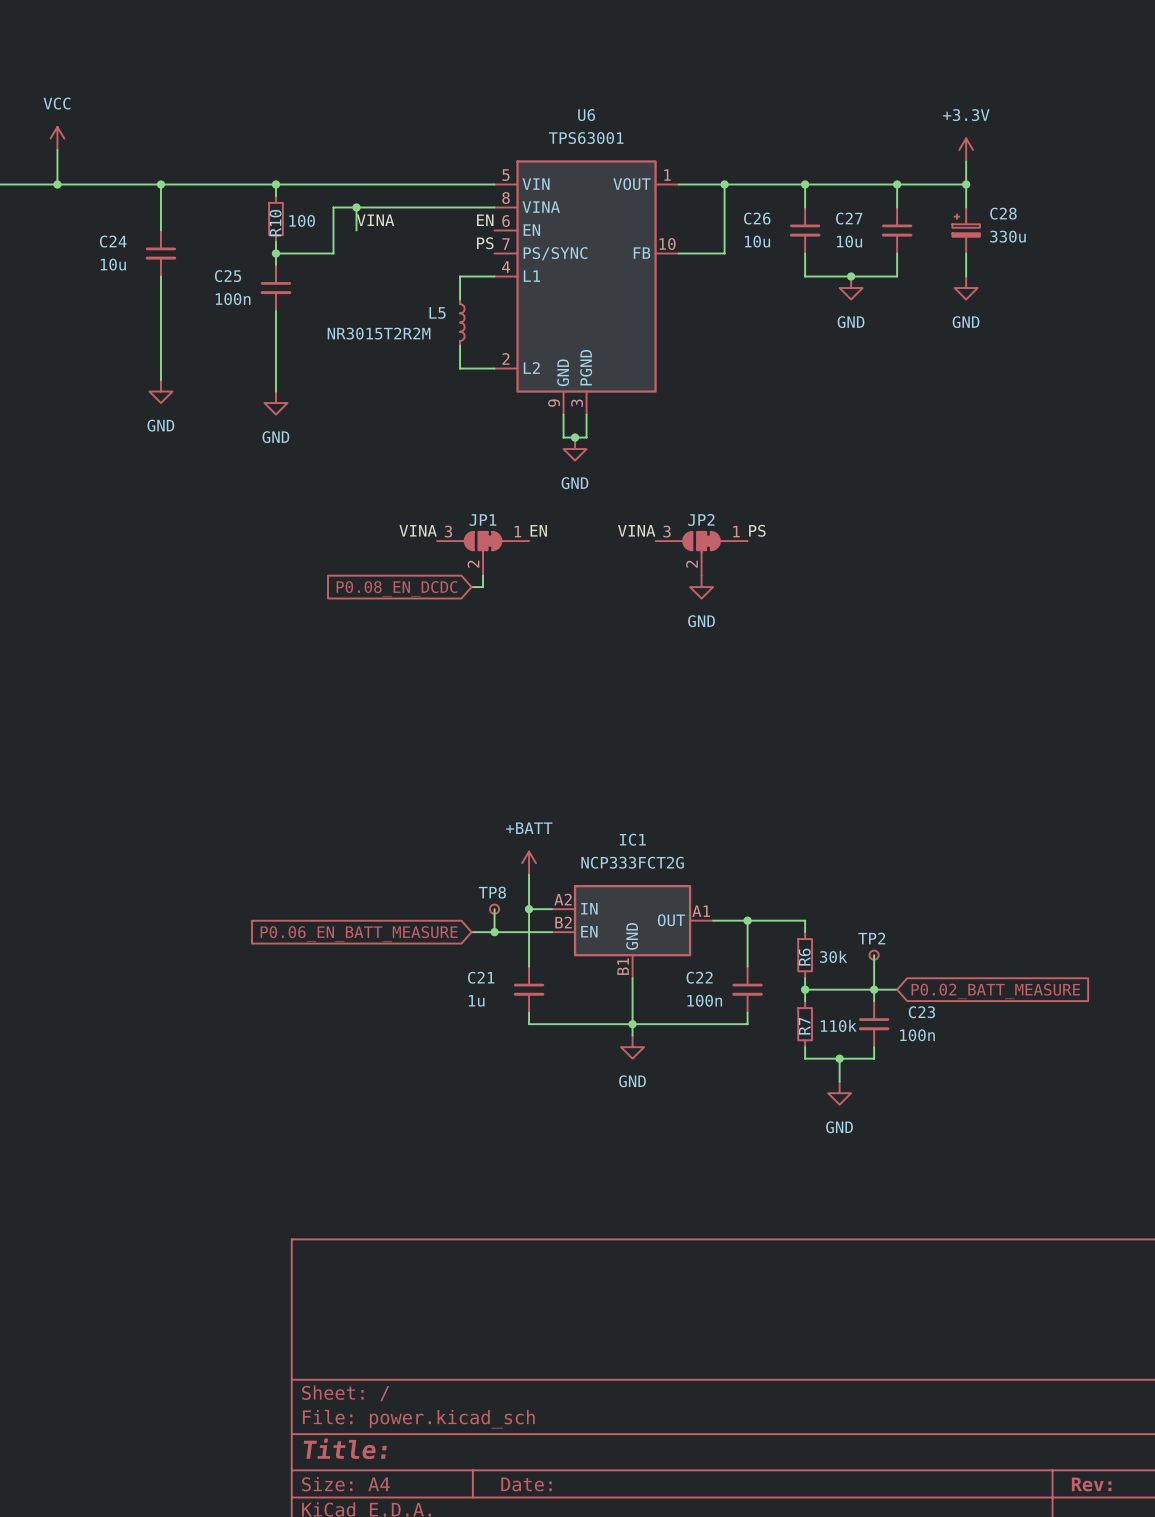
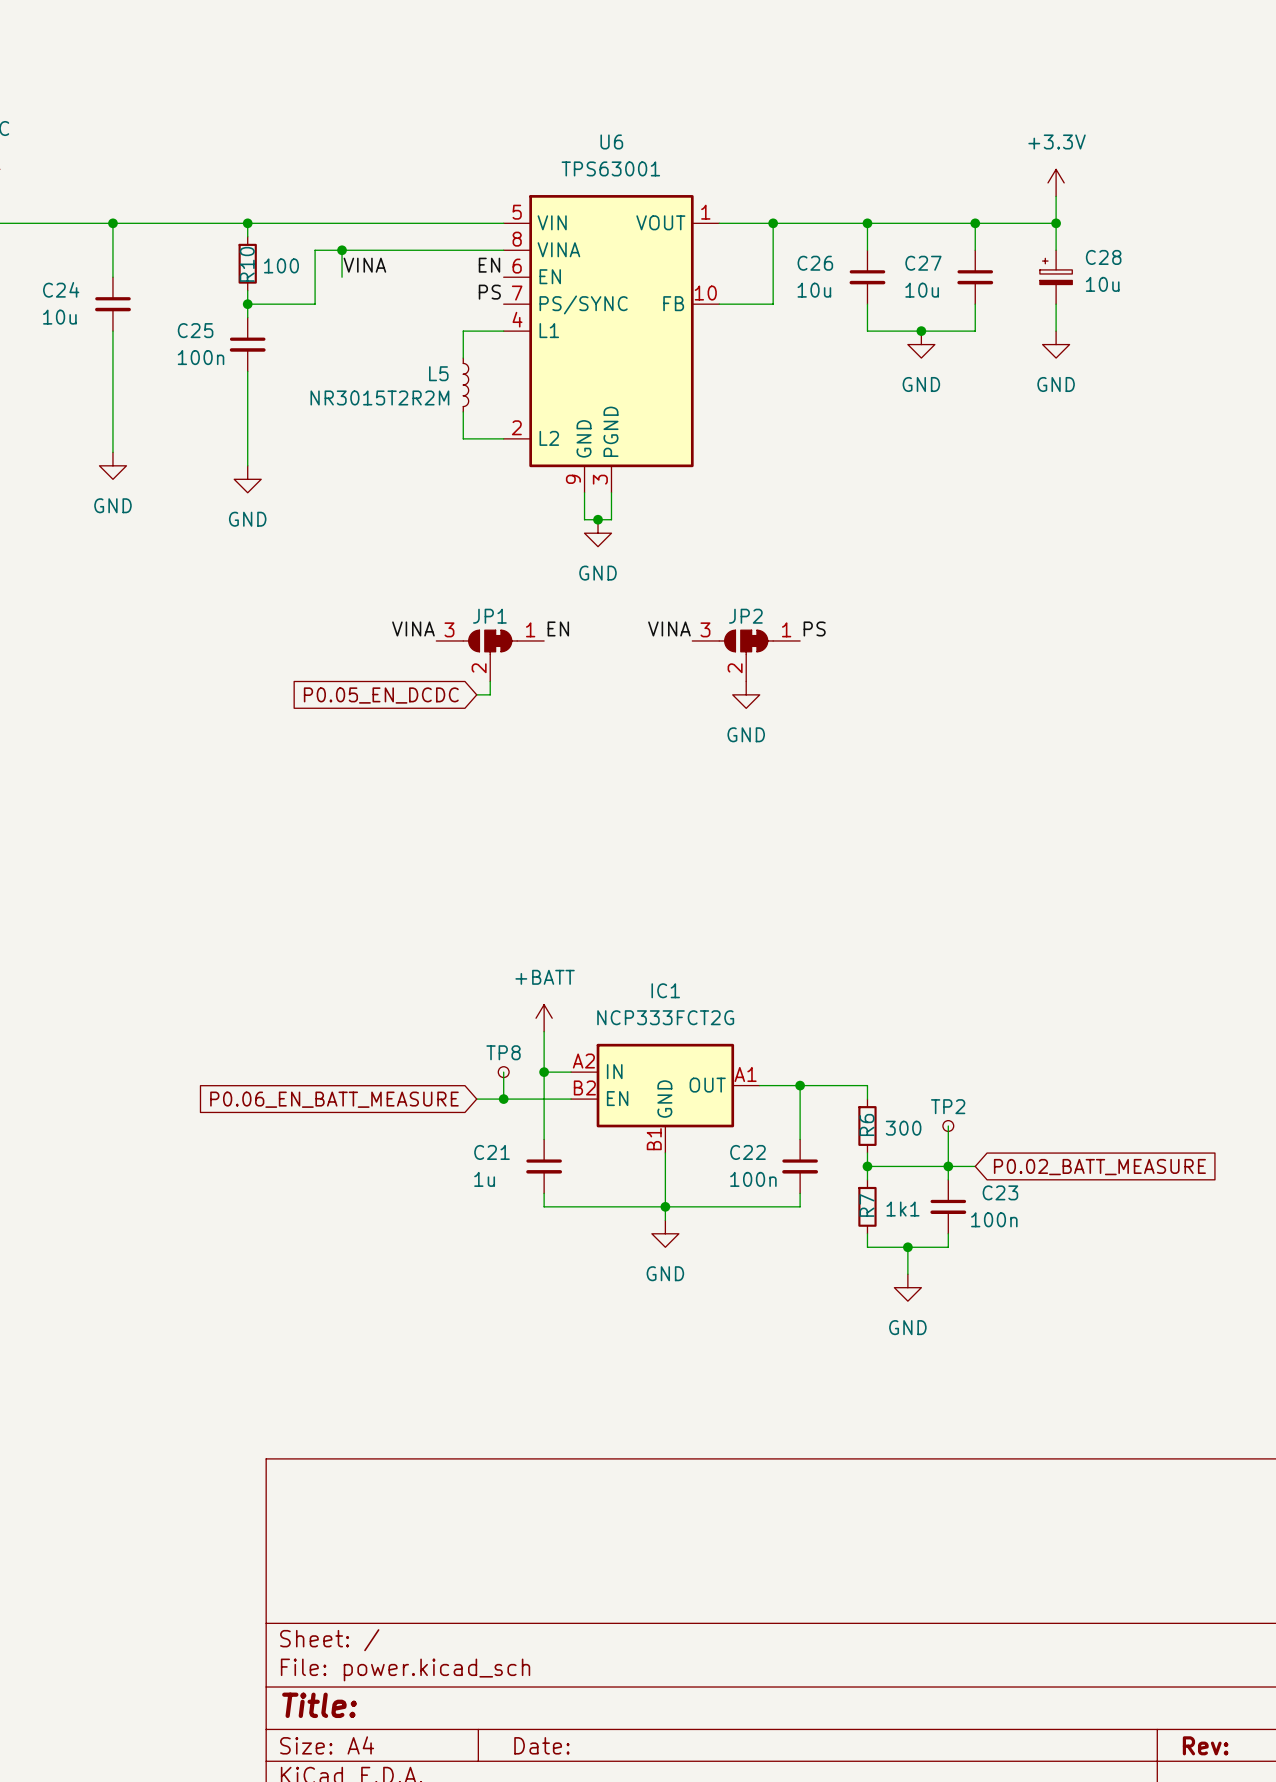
C28 value: 330u (1007, 236) -> 10u (1102, 284)
global label: P0.08_EN_DCDC (396, 588) -> P0.05_EN_DCDC (381, 695)
R6 value: 30k (833, 956) -> 300 (903, 1128)
R7 value: 110k (838, 1025) -> 1k1 (902, 1209)

